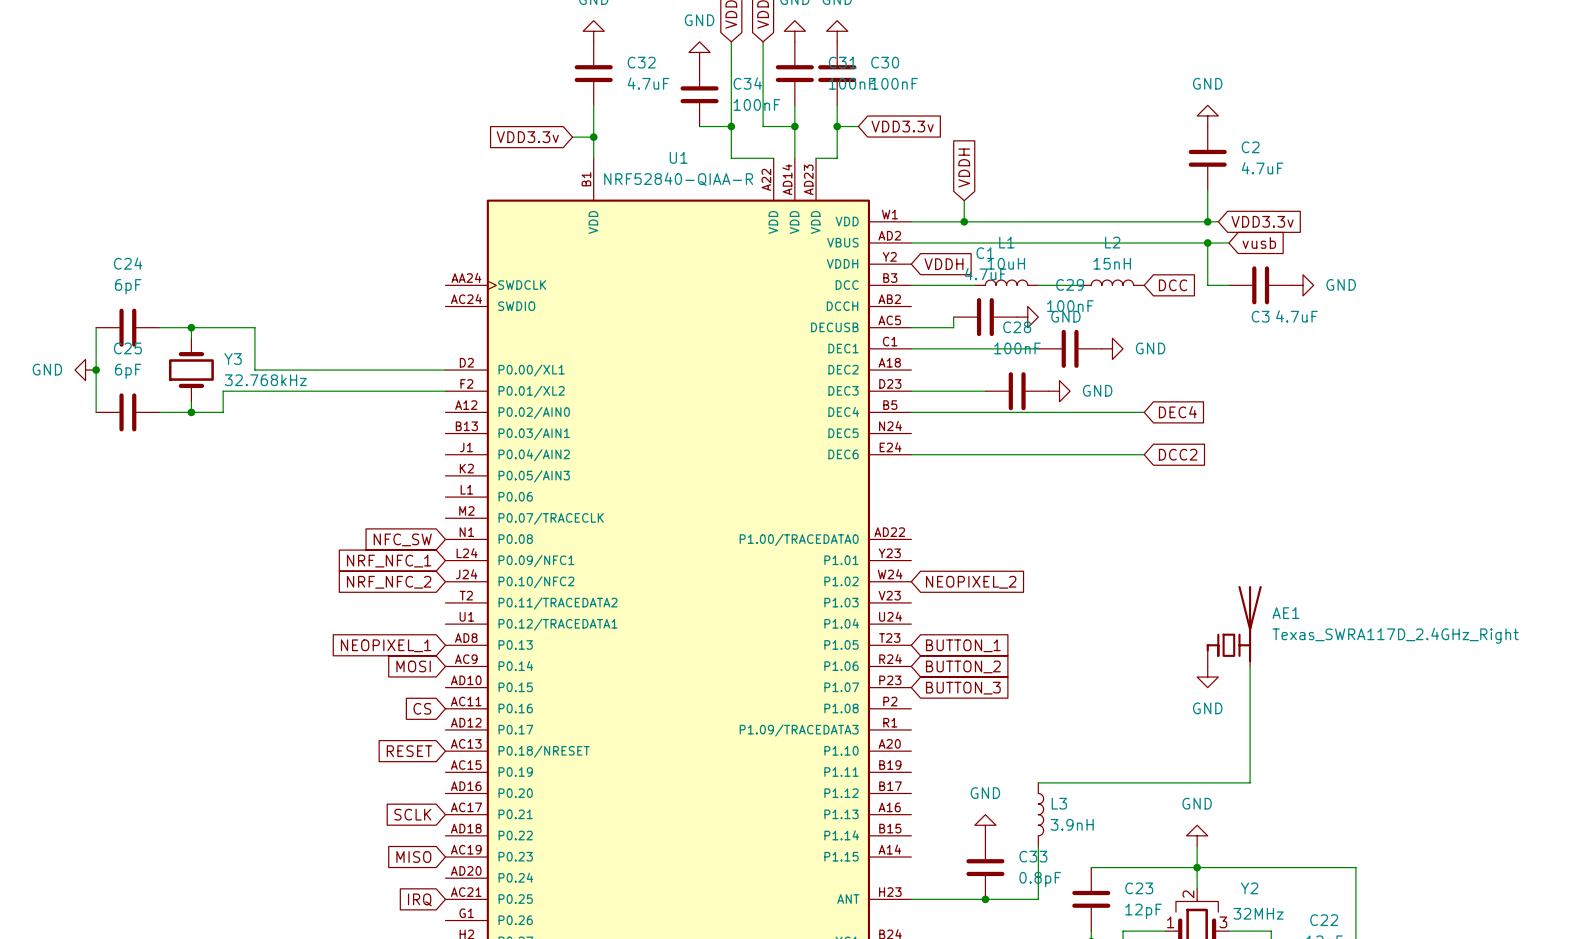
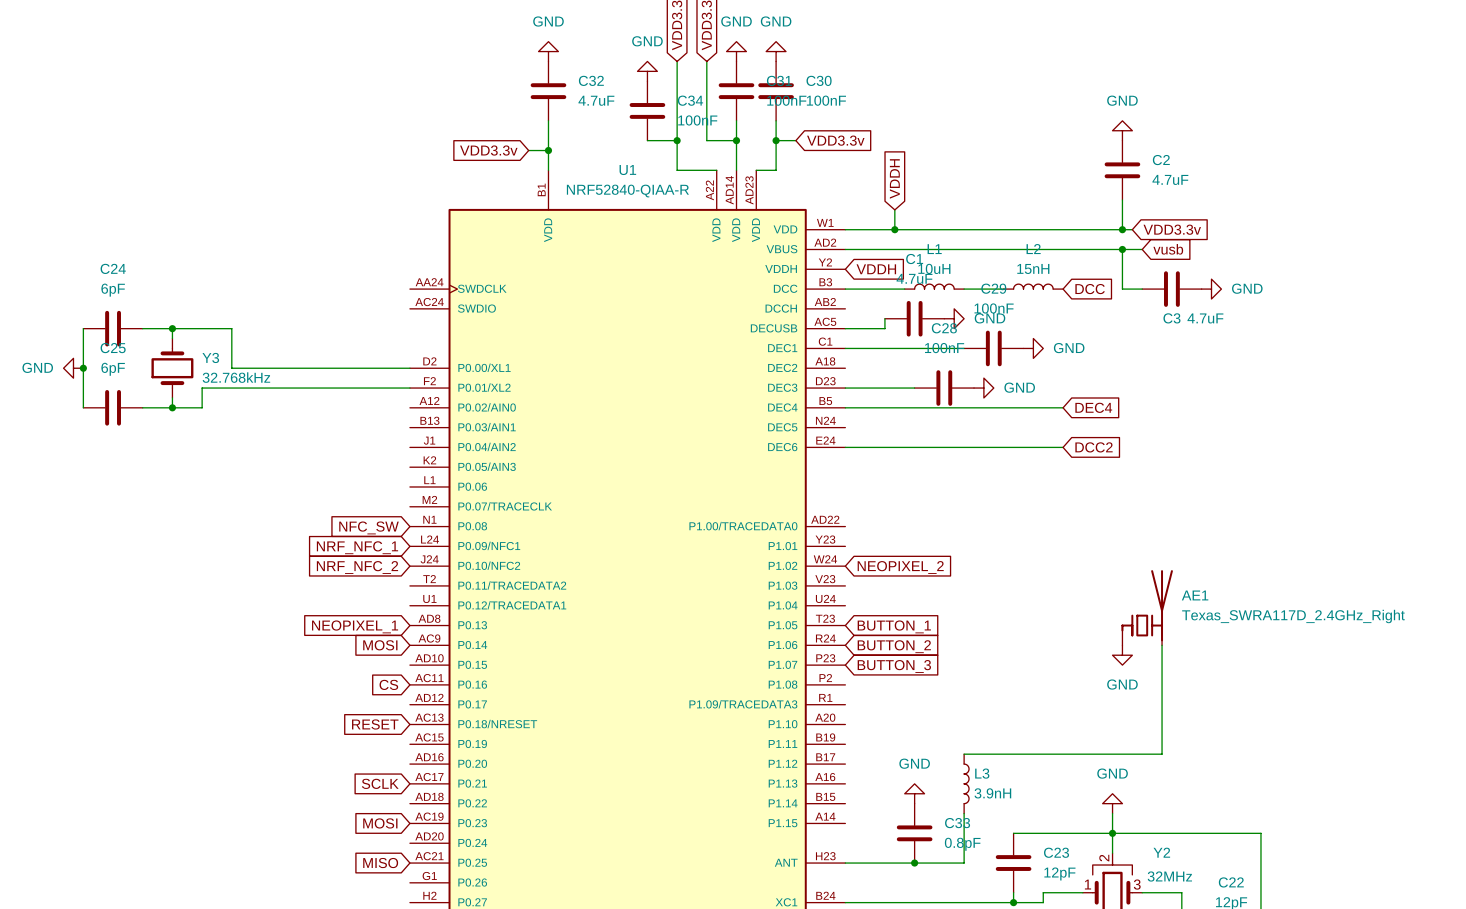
global label: MISO (413, 857) -> MOSI (380, 823)
global label: IRQ (419, 899) -> MISO (380, 863)

